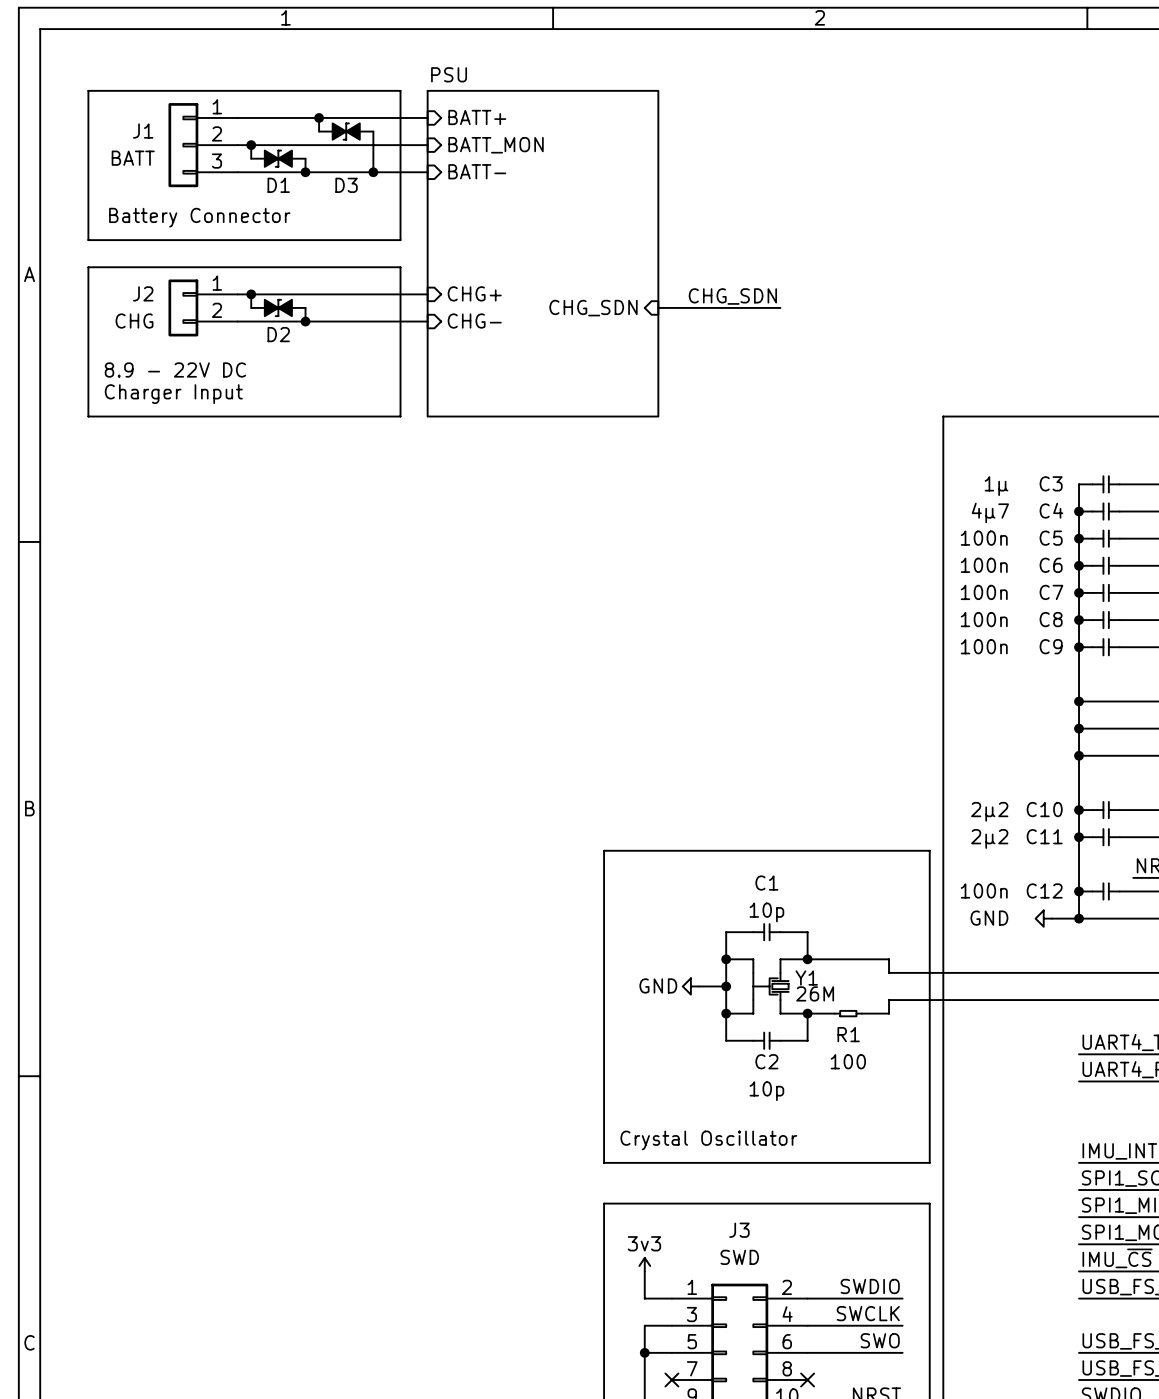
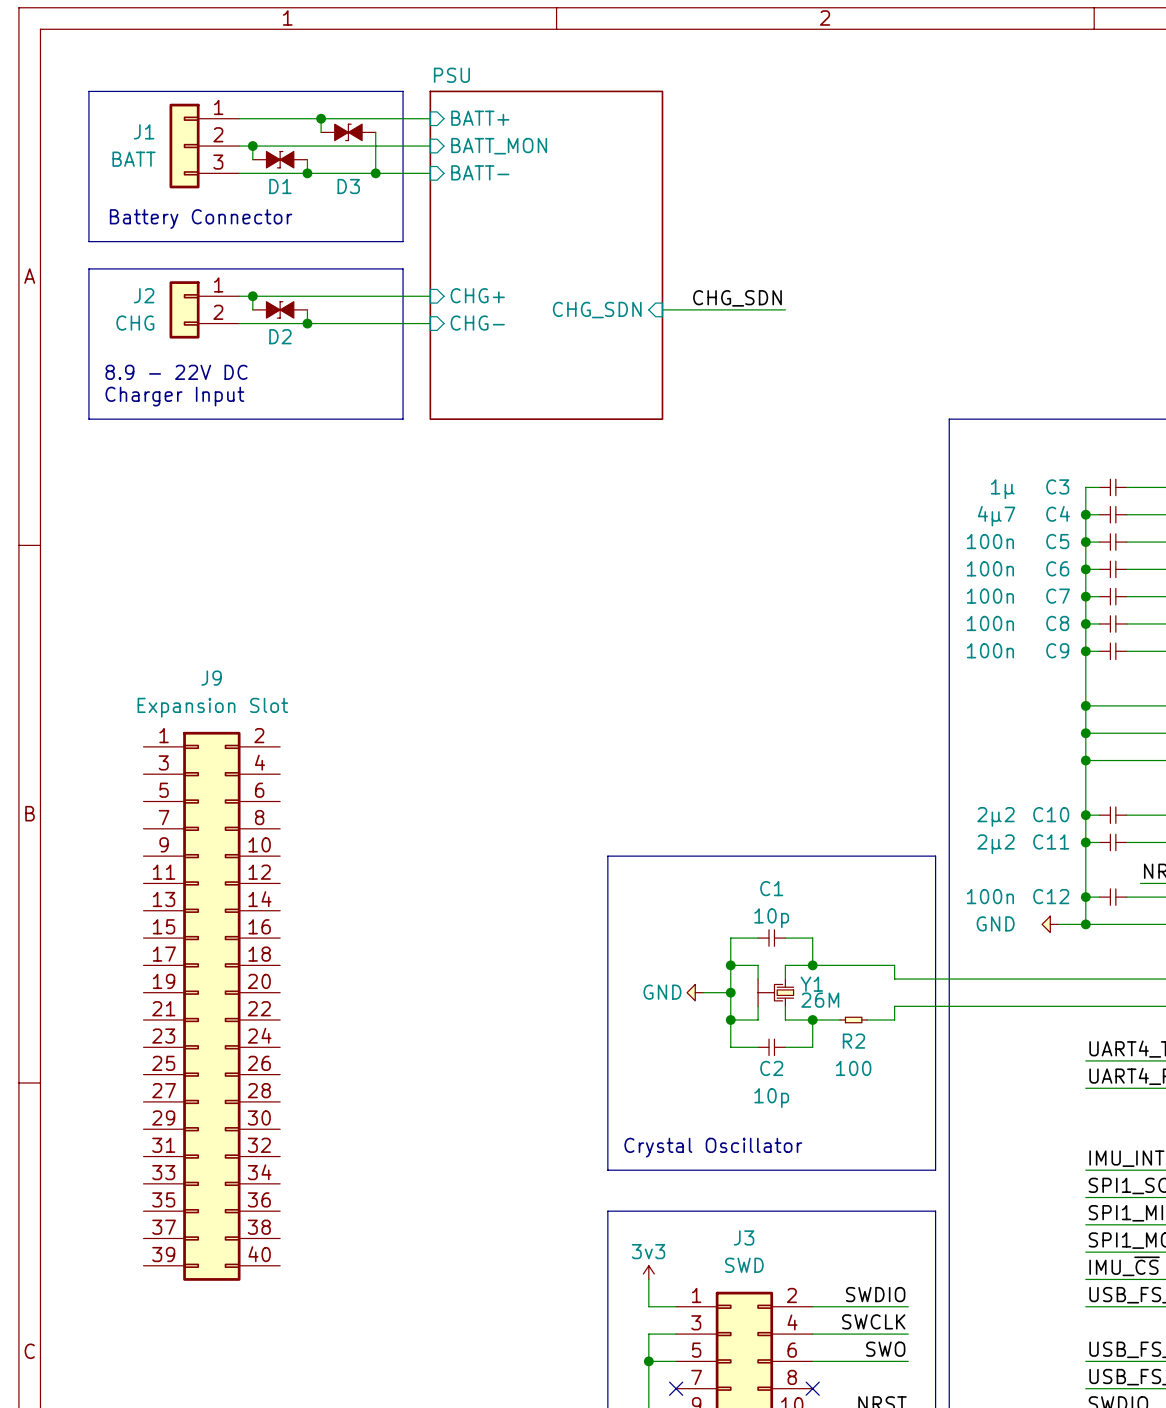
J9: none -> Expansion Slot (211, 1006)
R1 name: R1 (848, 1034) -> R2 (853, 1041)

